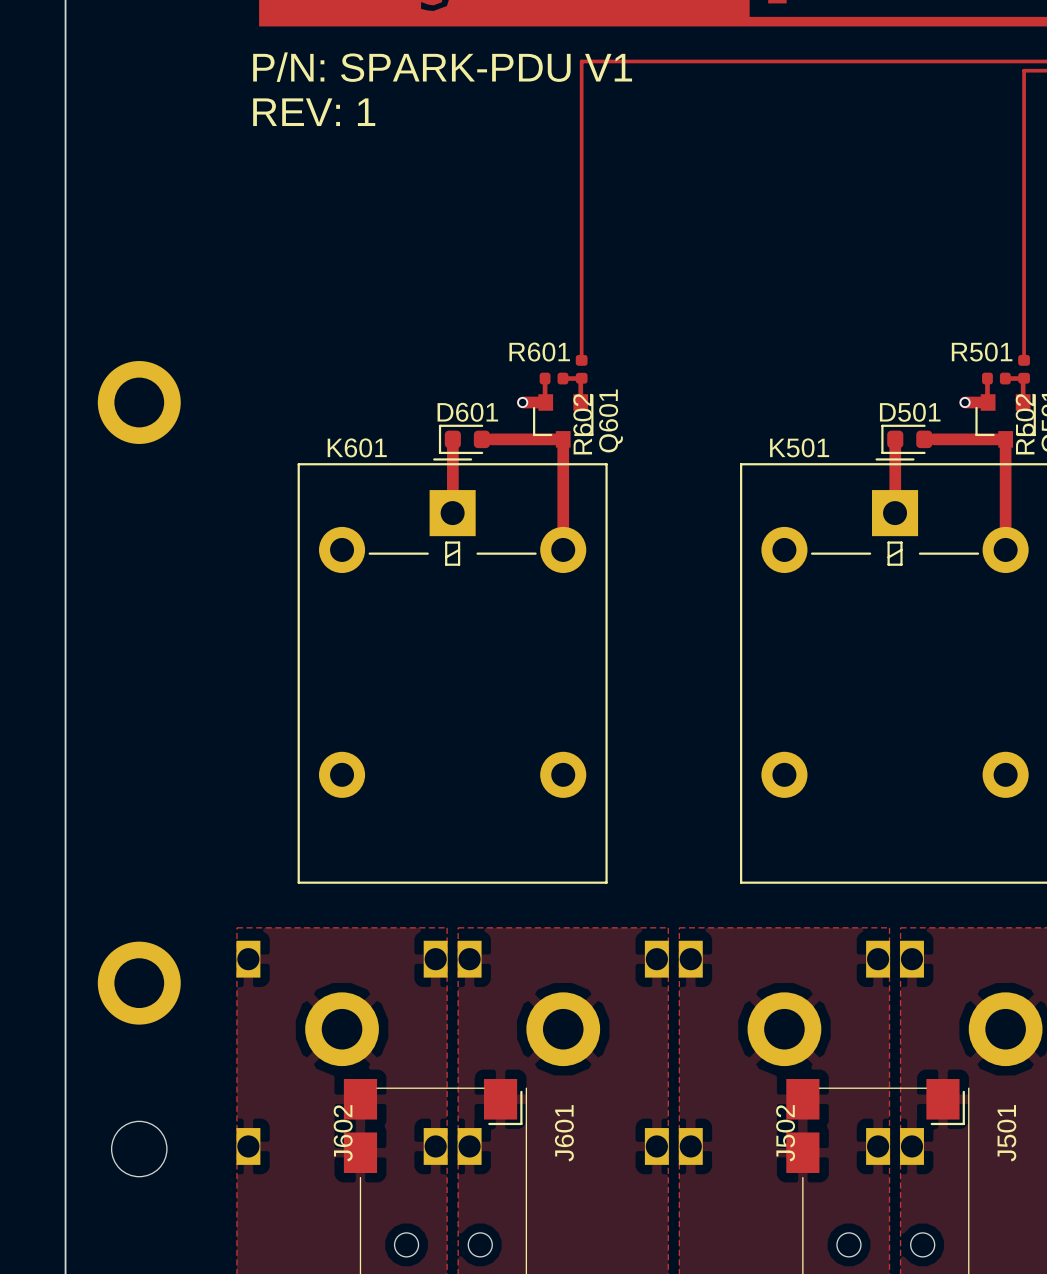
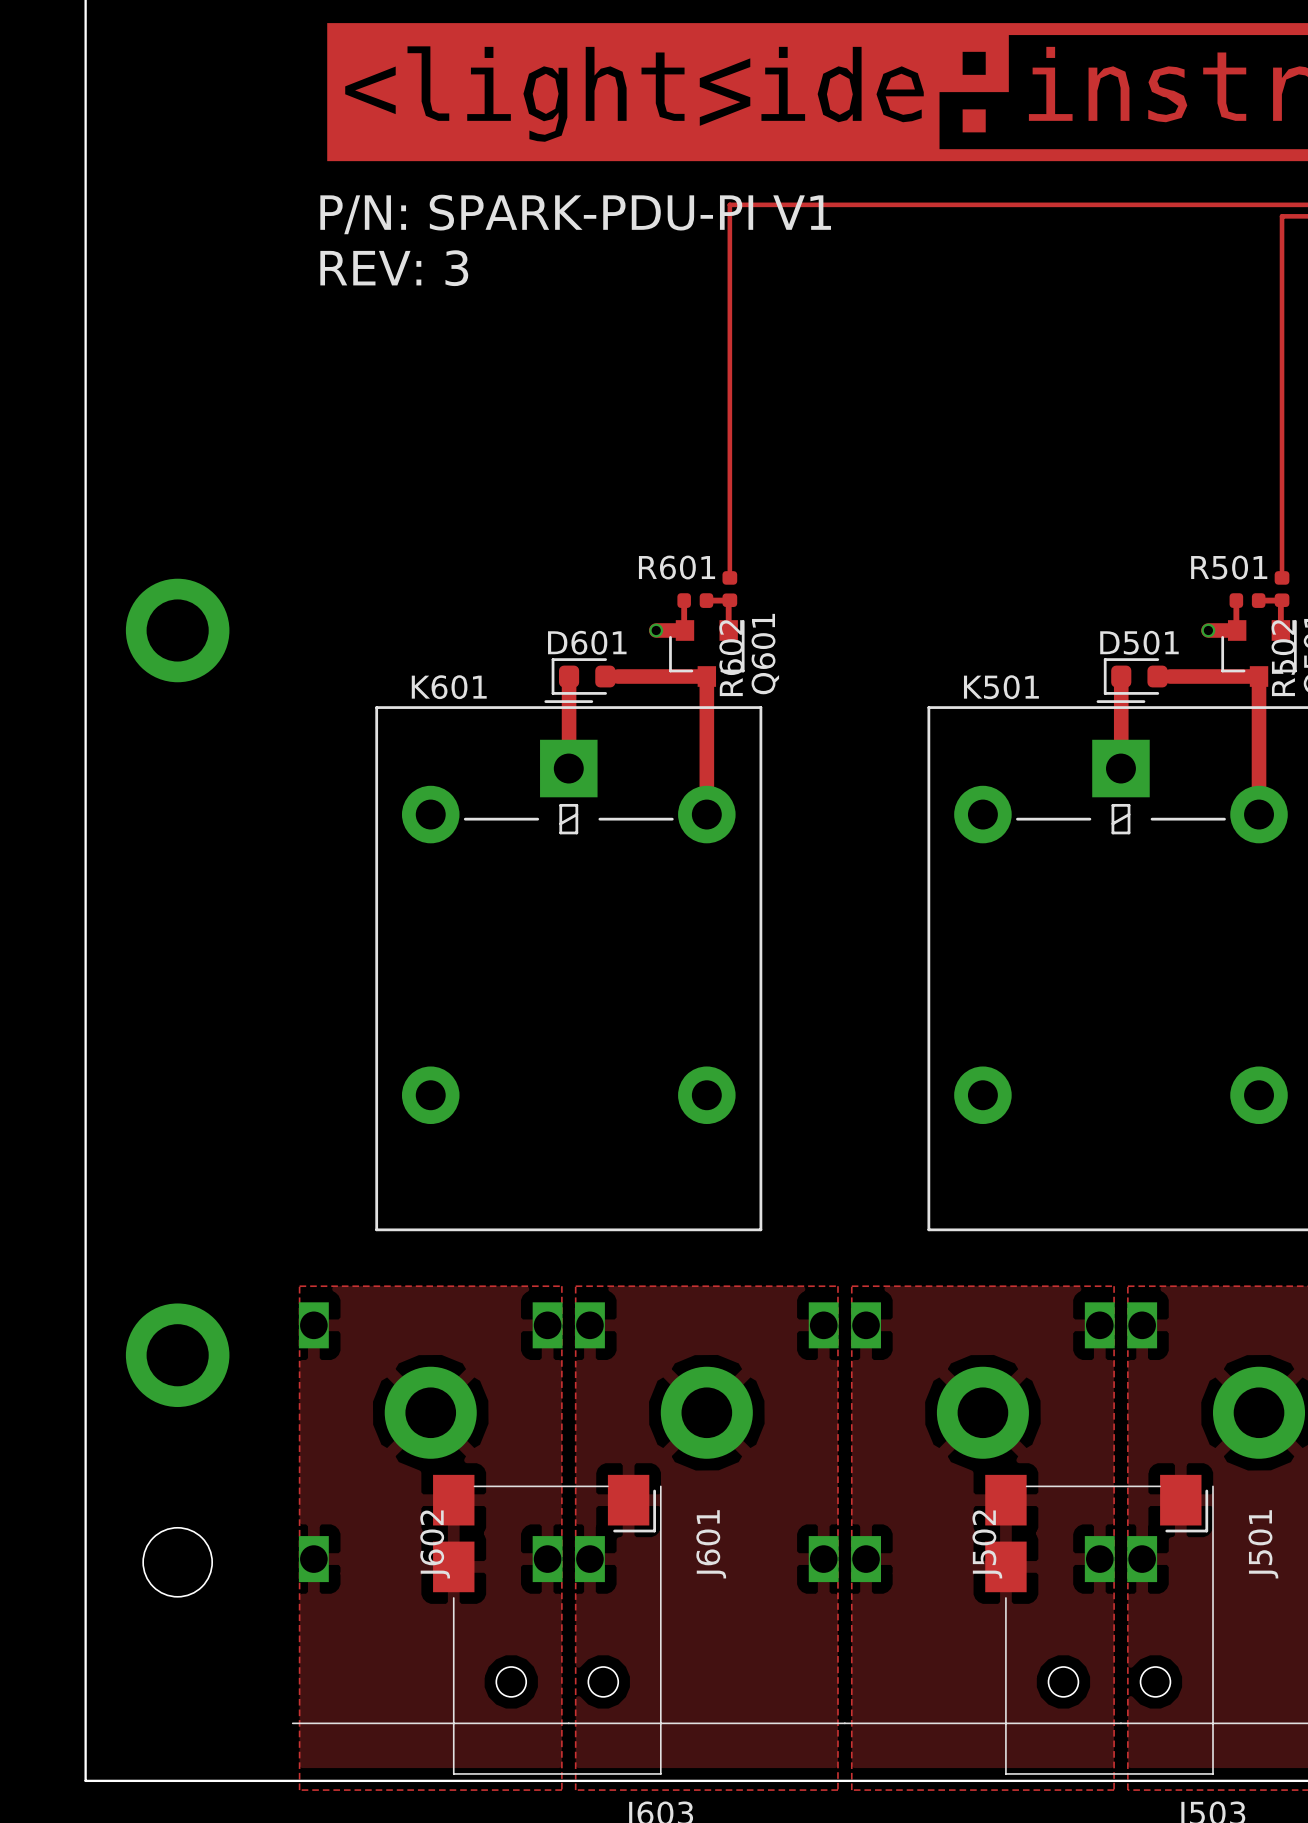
text: P/N: SPARK-PDU V1 (442, 67) -> P/N: SPARK-PDU-PI V1 (575, 214)
text: REV: 1 (314, 112) -> REV: 3 (394, 268)

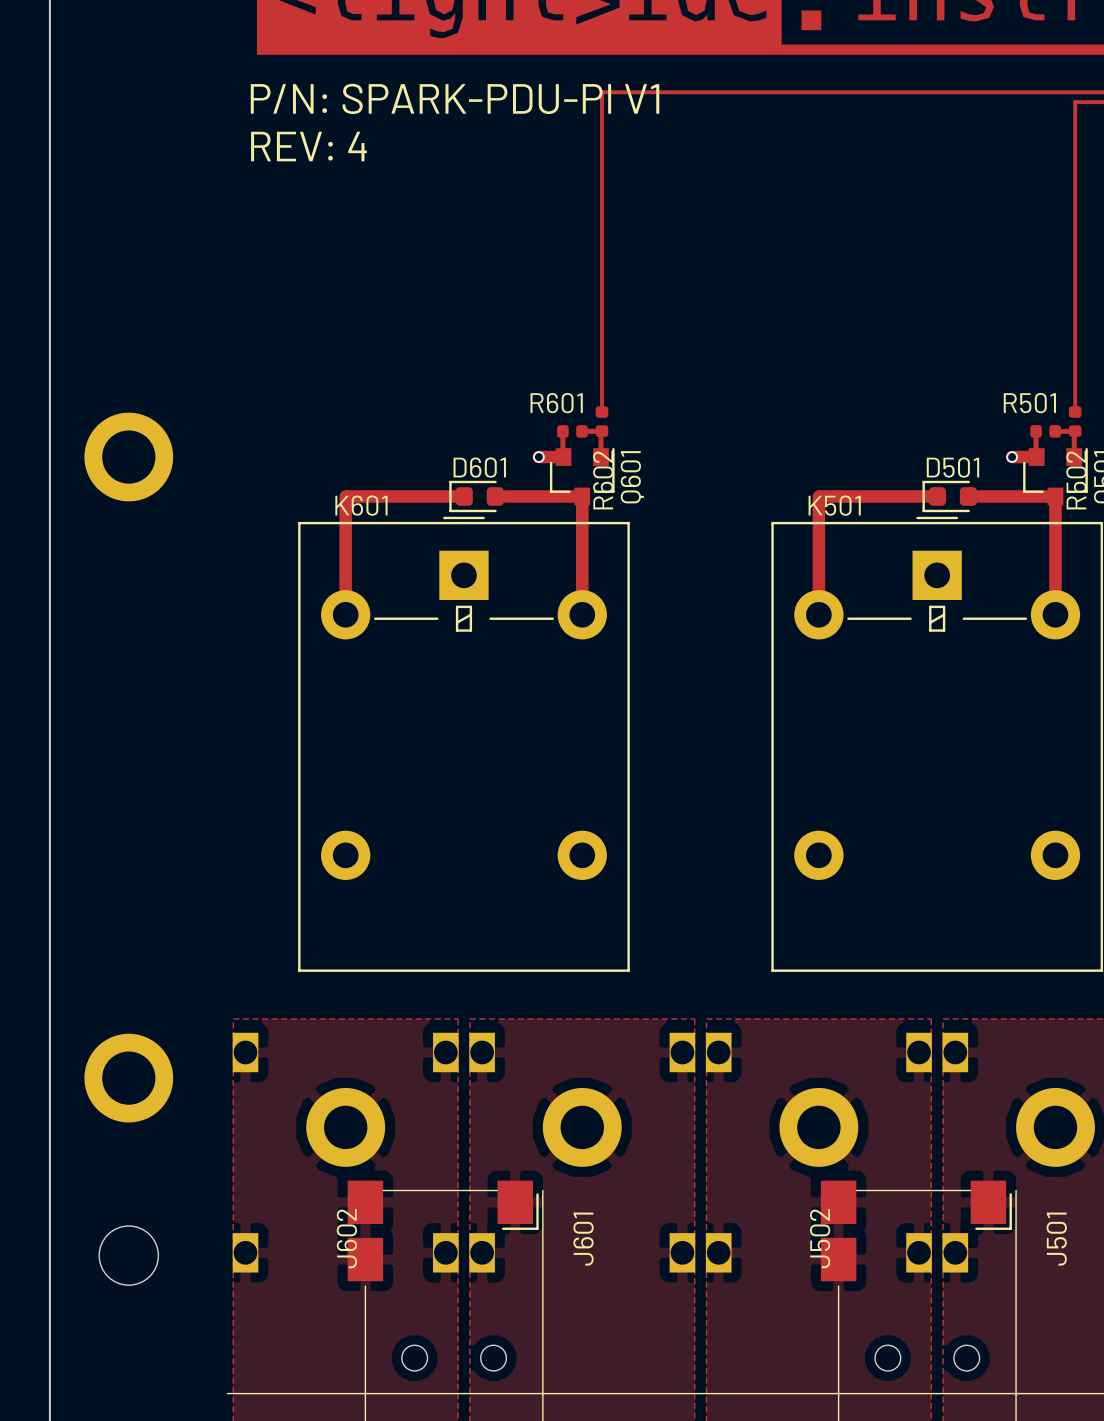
text: REV: 3 (394, 268) -> REV: 4 (308, 146)
track: none -> (345, 496) (345, 614)
track: (569, 676) (569, 768) -> (464, 496) (348, 496)
track: none -> (818, 496) (818, 614)
track: (1121, 676) (1121, 768) -> (937, 496) (821, 496)

